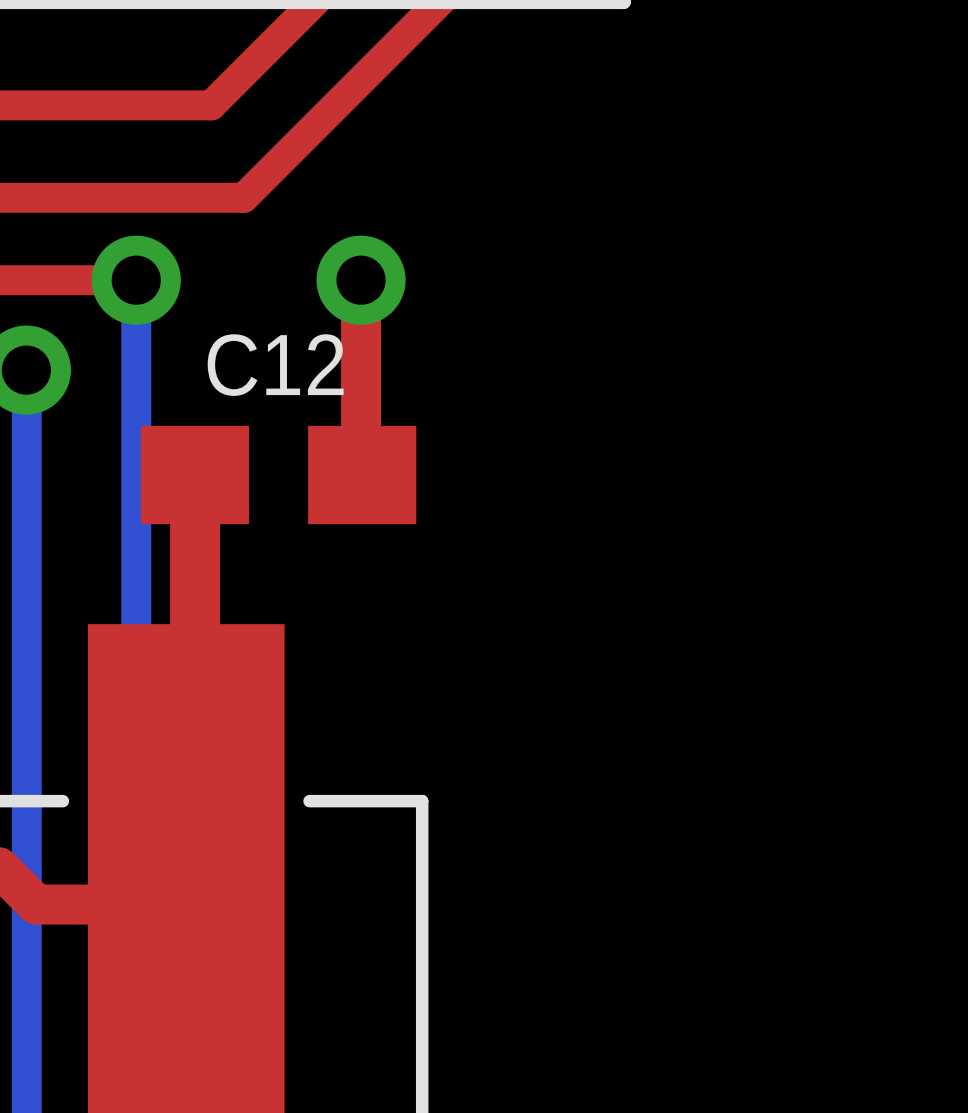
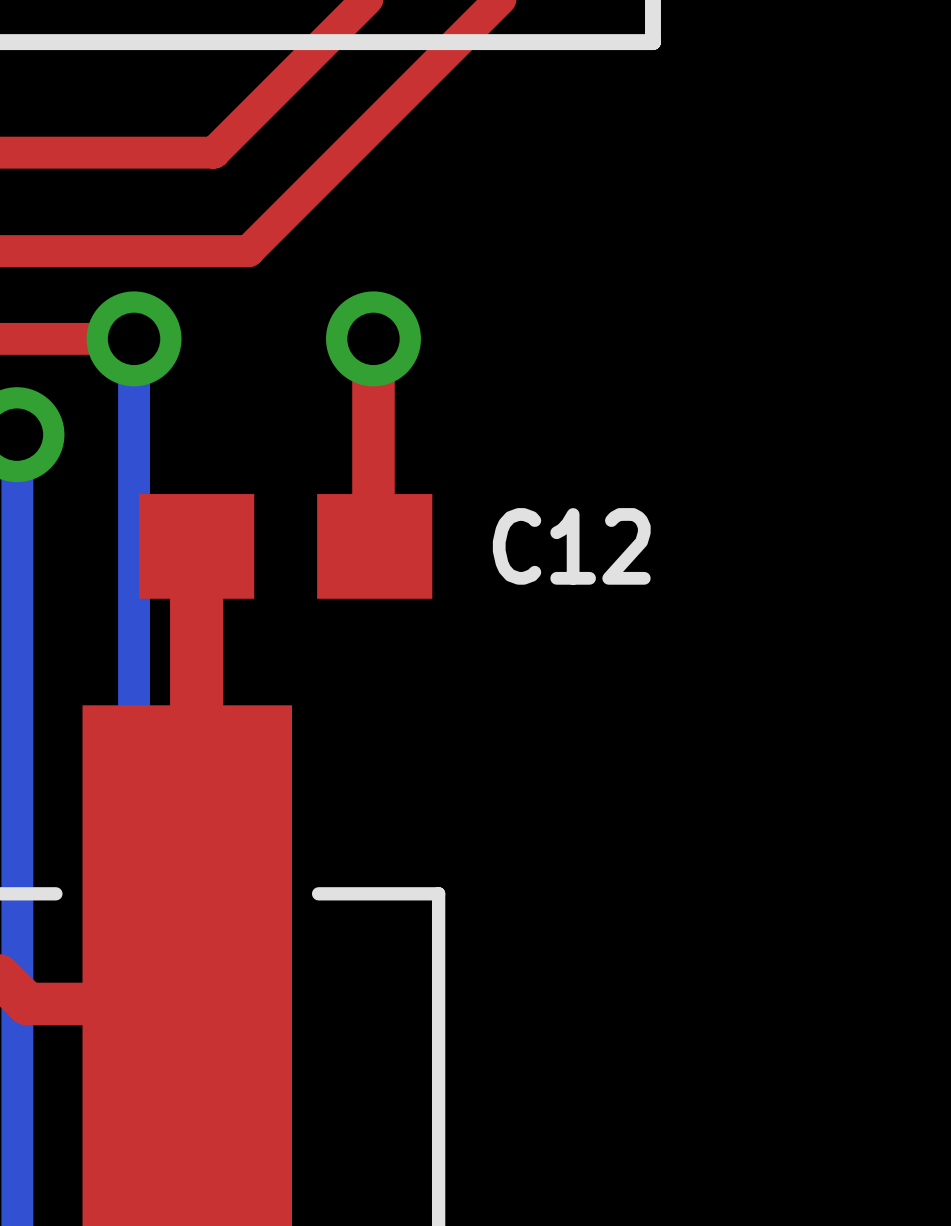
C12 name position: C12 (275, 365) -> C12 (571, 546)

